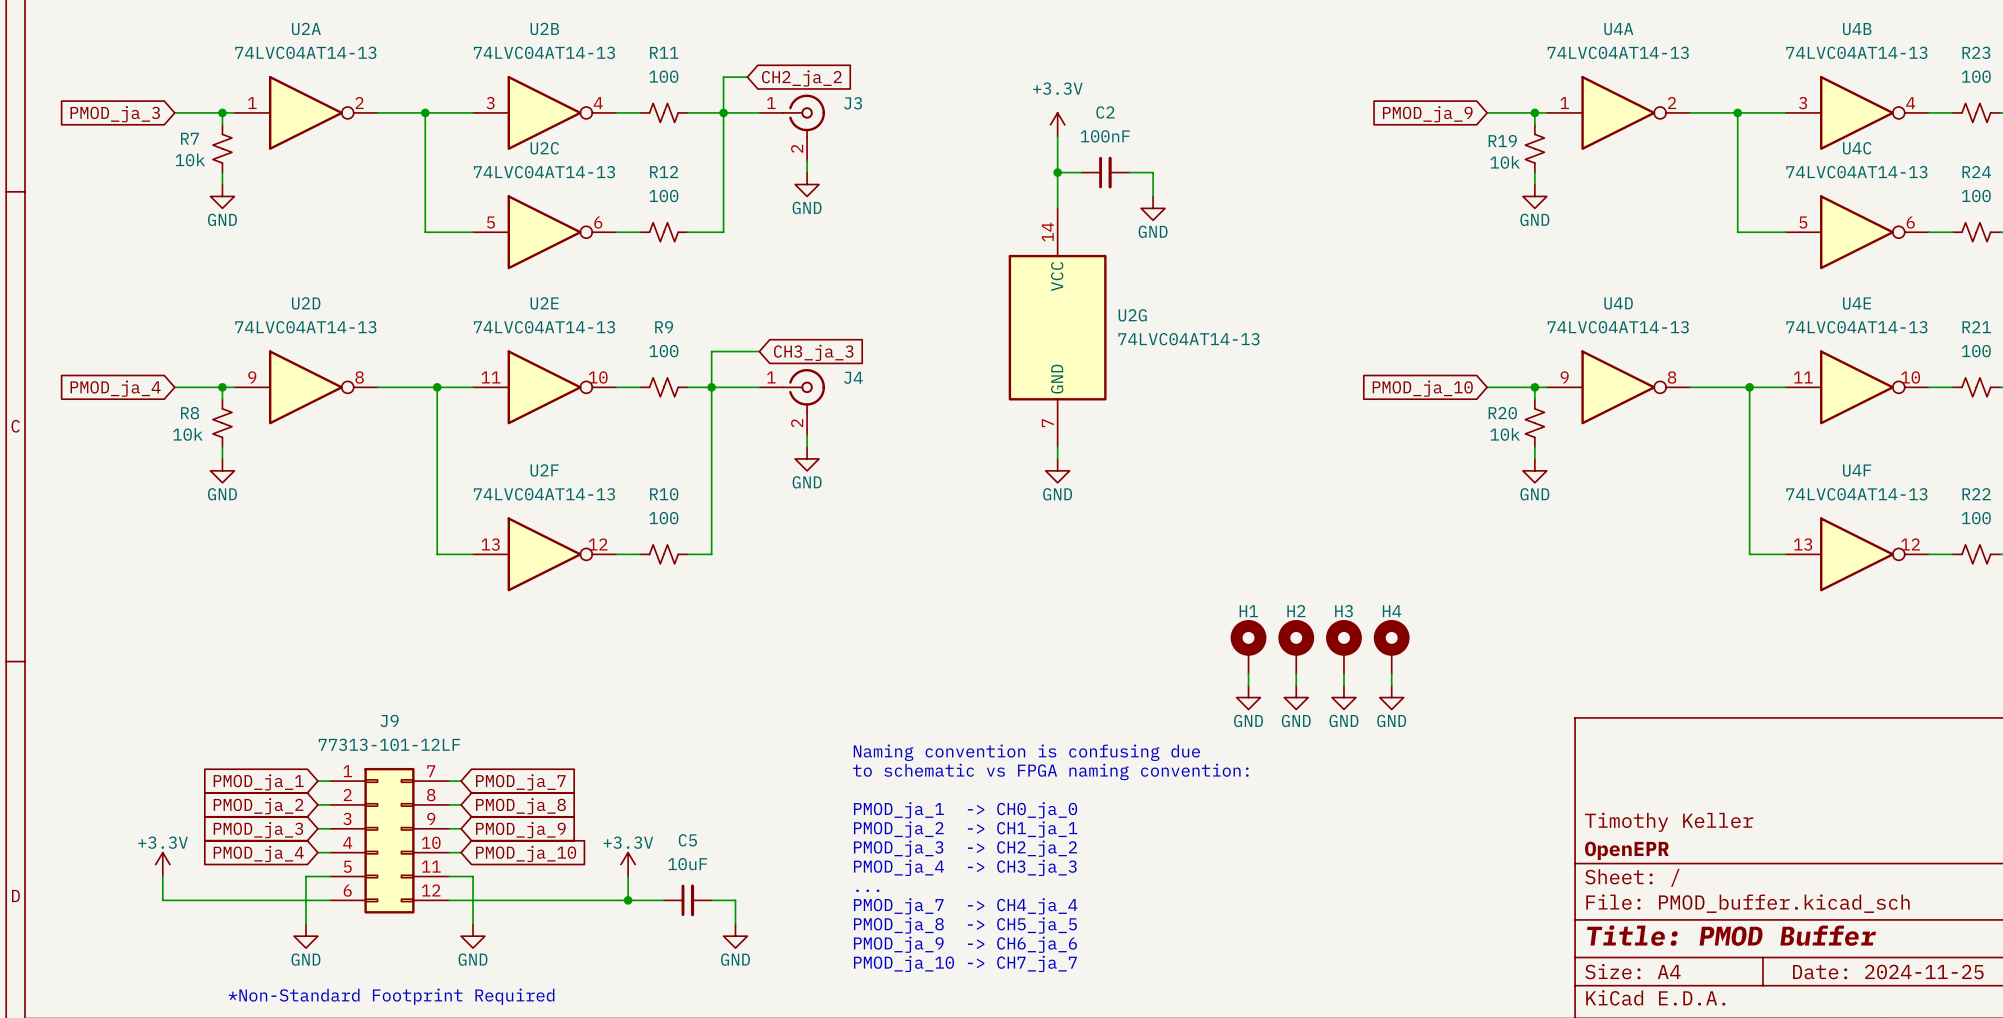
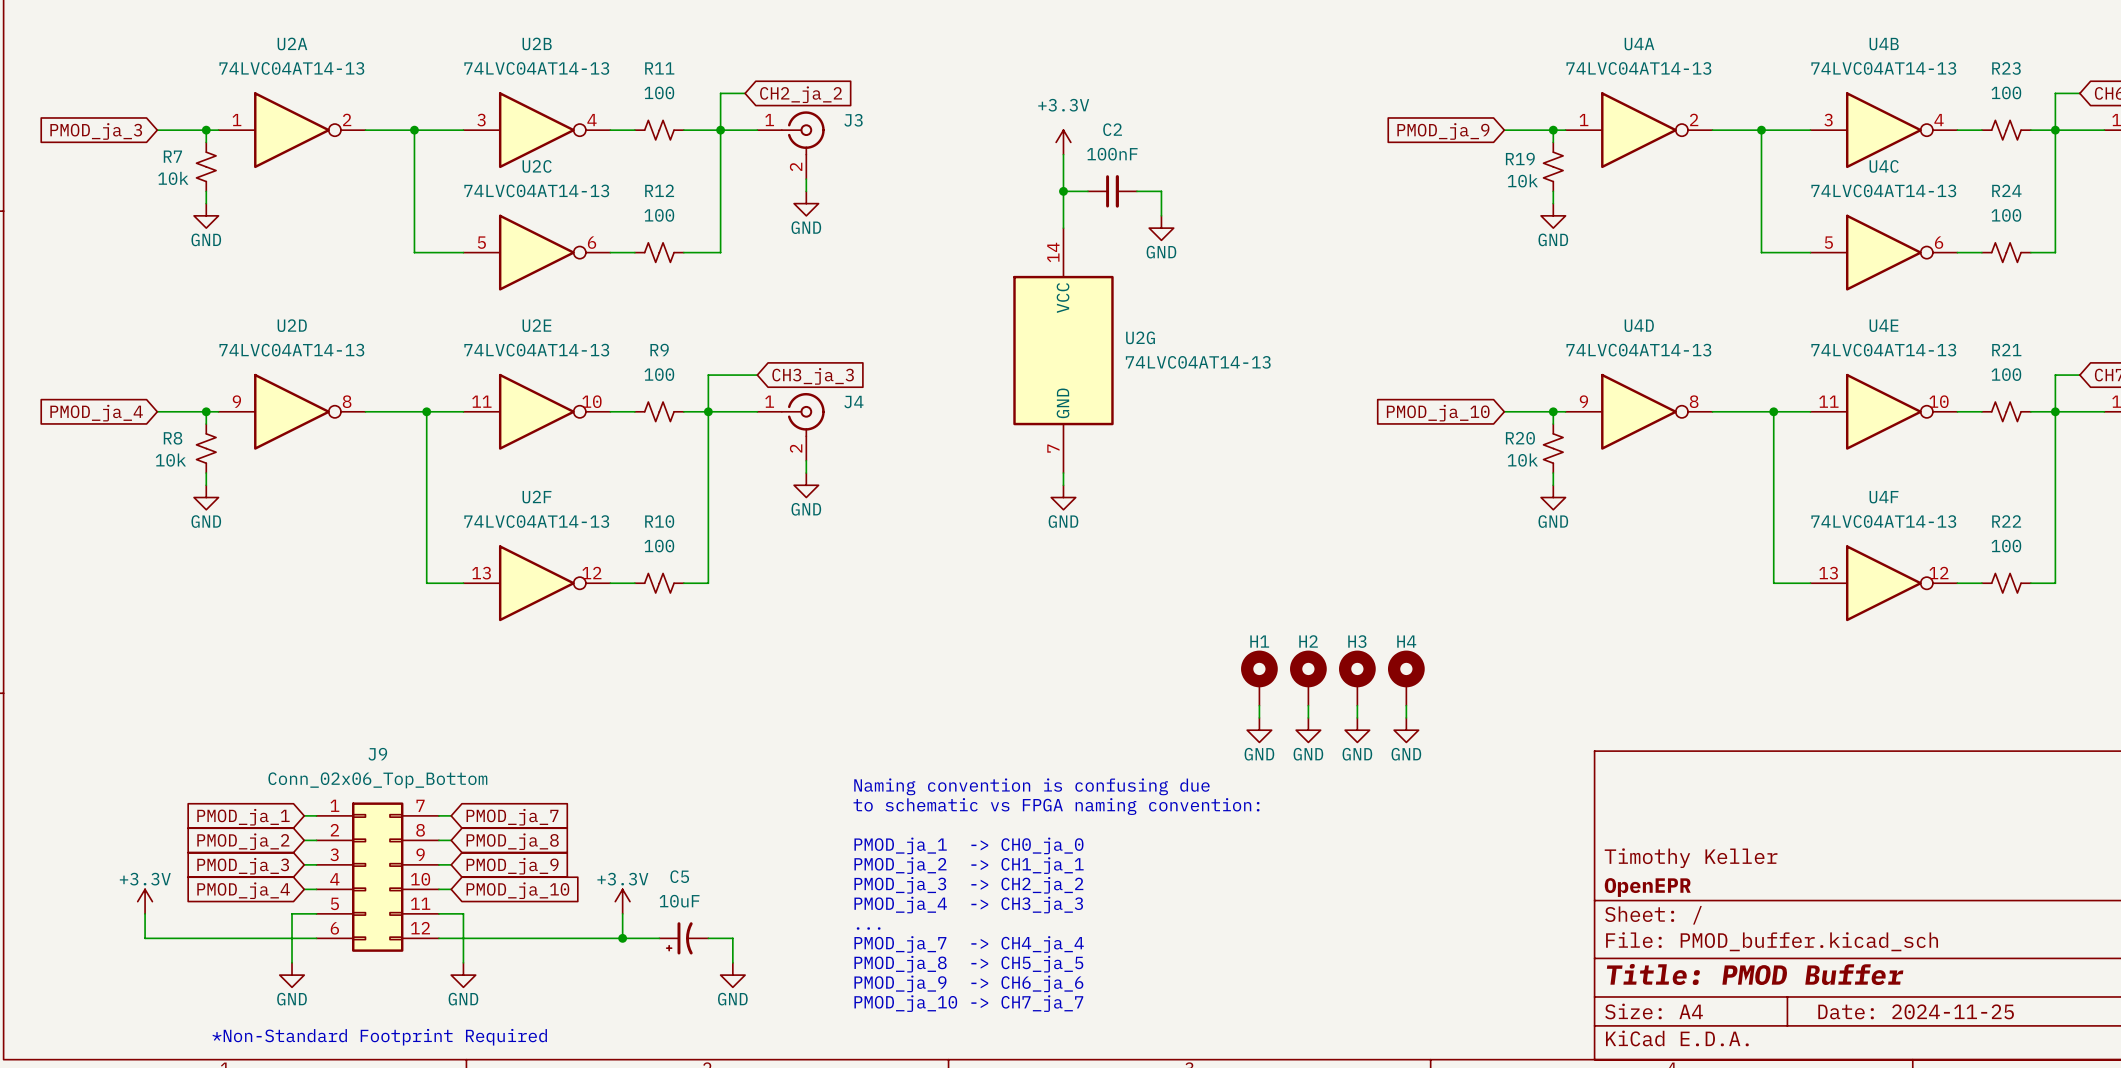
J9 value: 77313-101-12LF (389, 744) -> Conn_02x06_Top_Bottom (377, 780)
C5 symbol: [663, 884, 712, 917] -> [659, 922, 709, 955]

